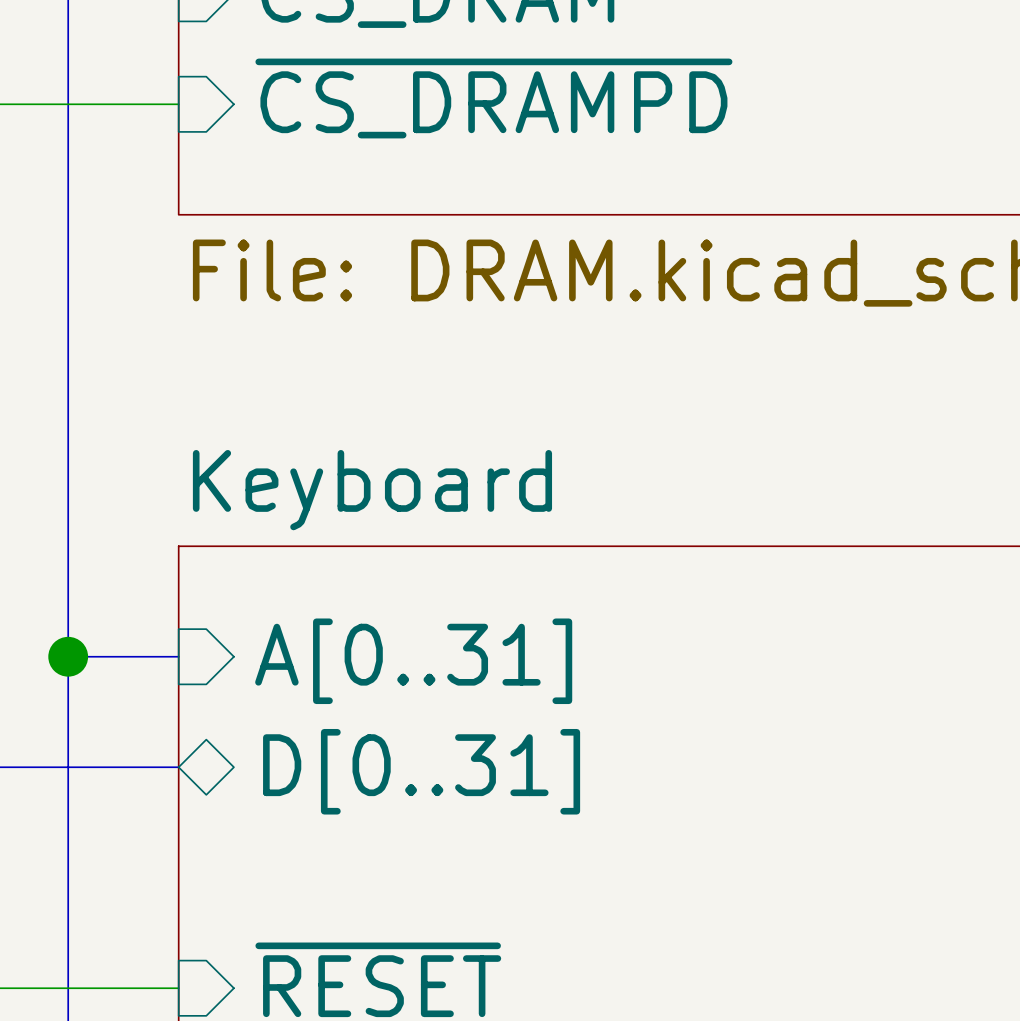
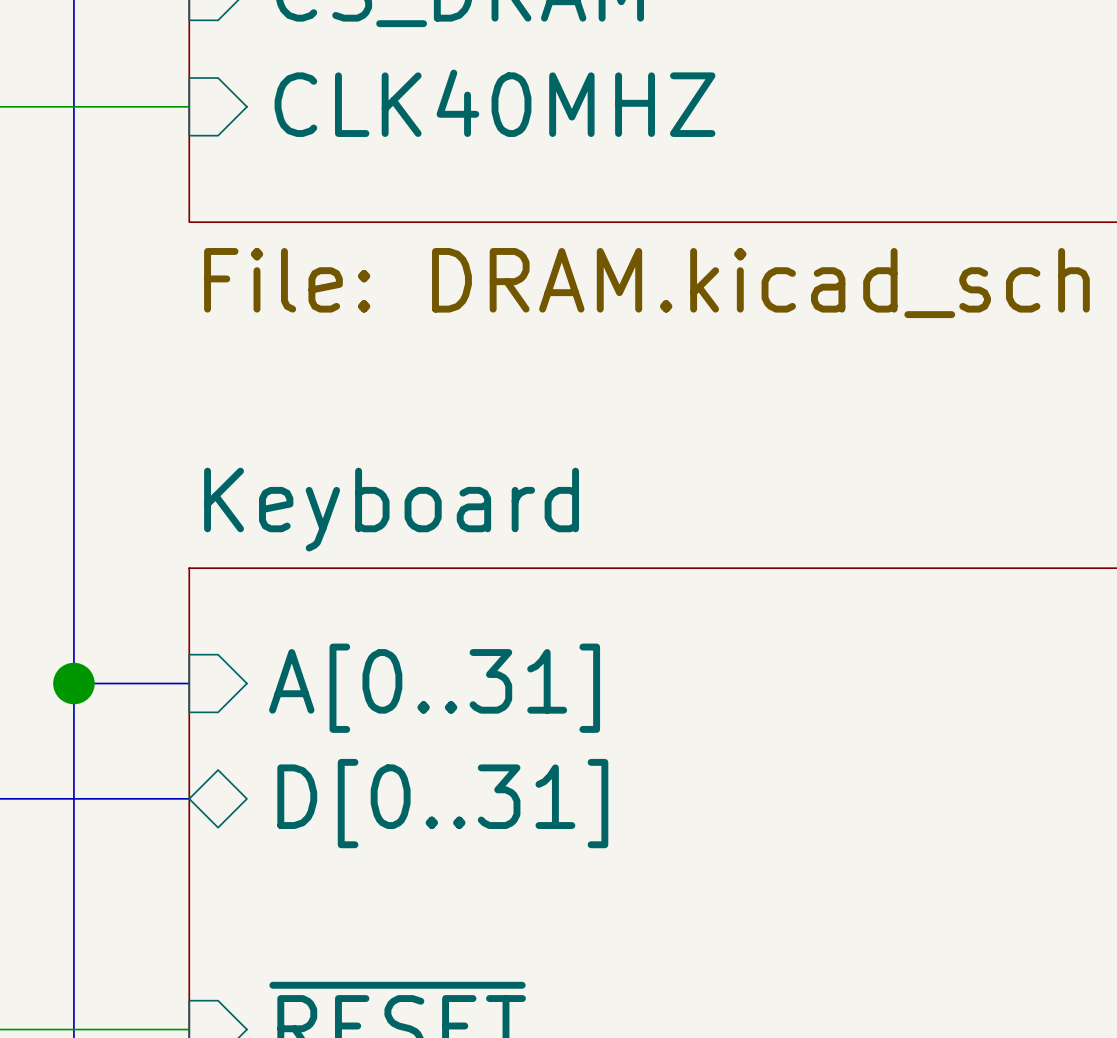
sheet pin: ~{CS_DRAMPD} (493, 98) -> CLK40MHZ (494, 103)

